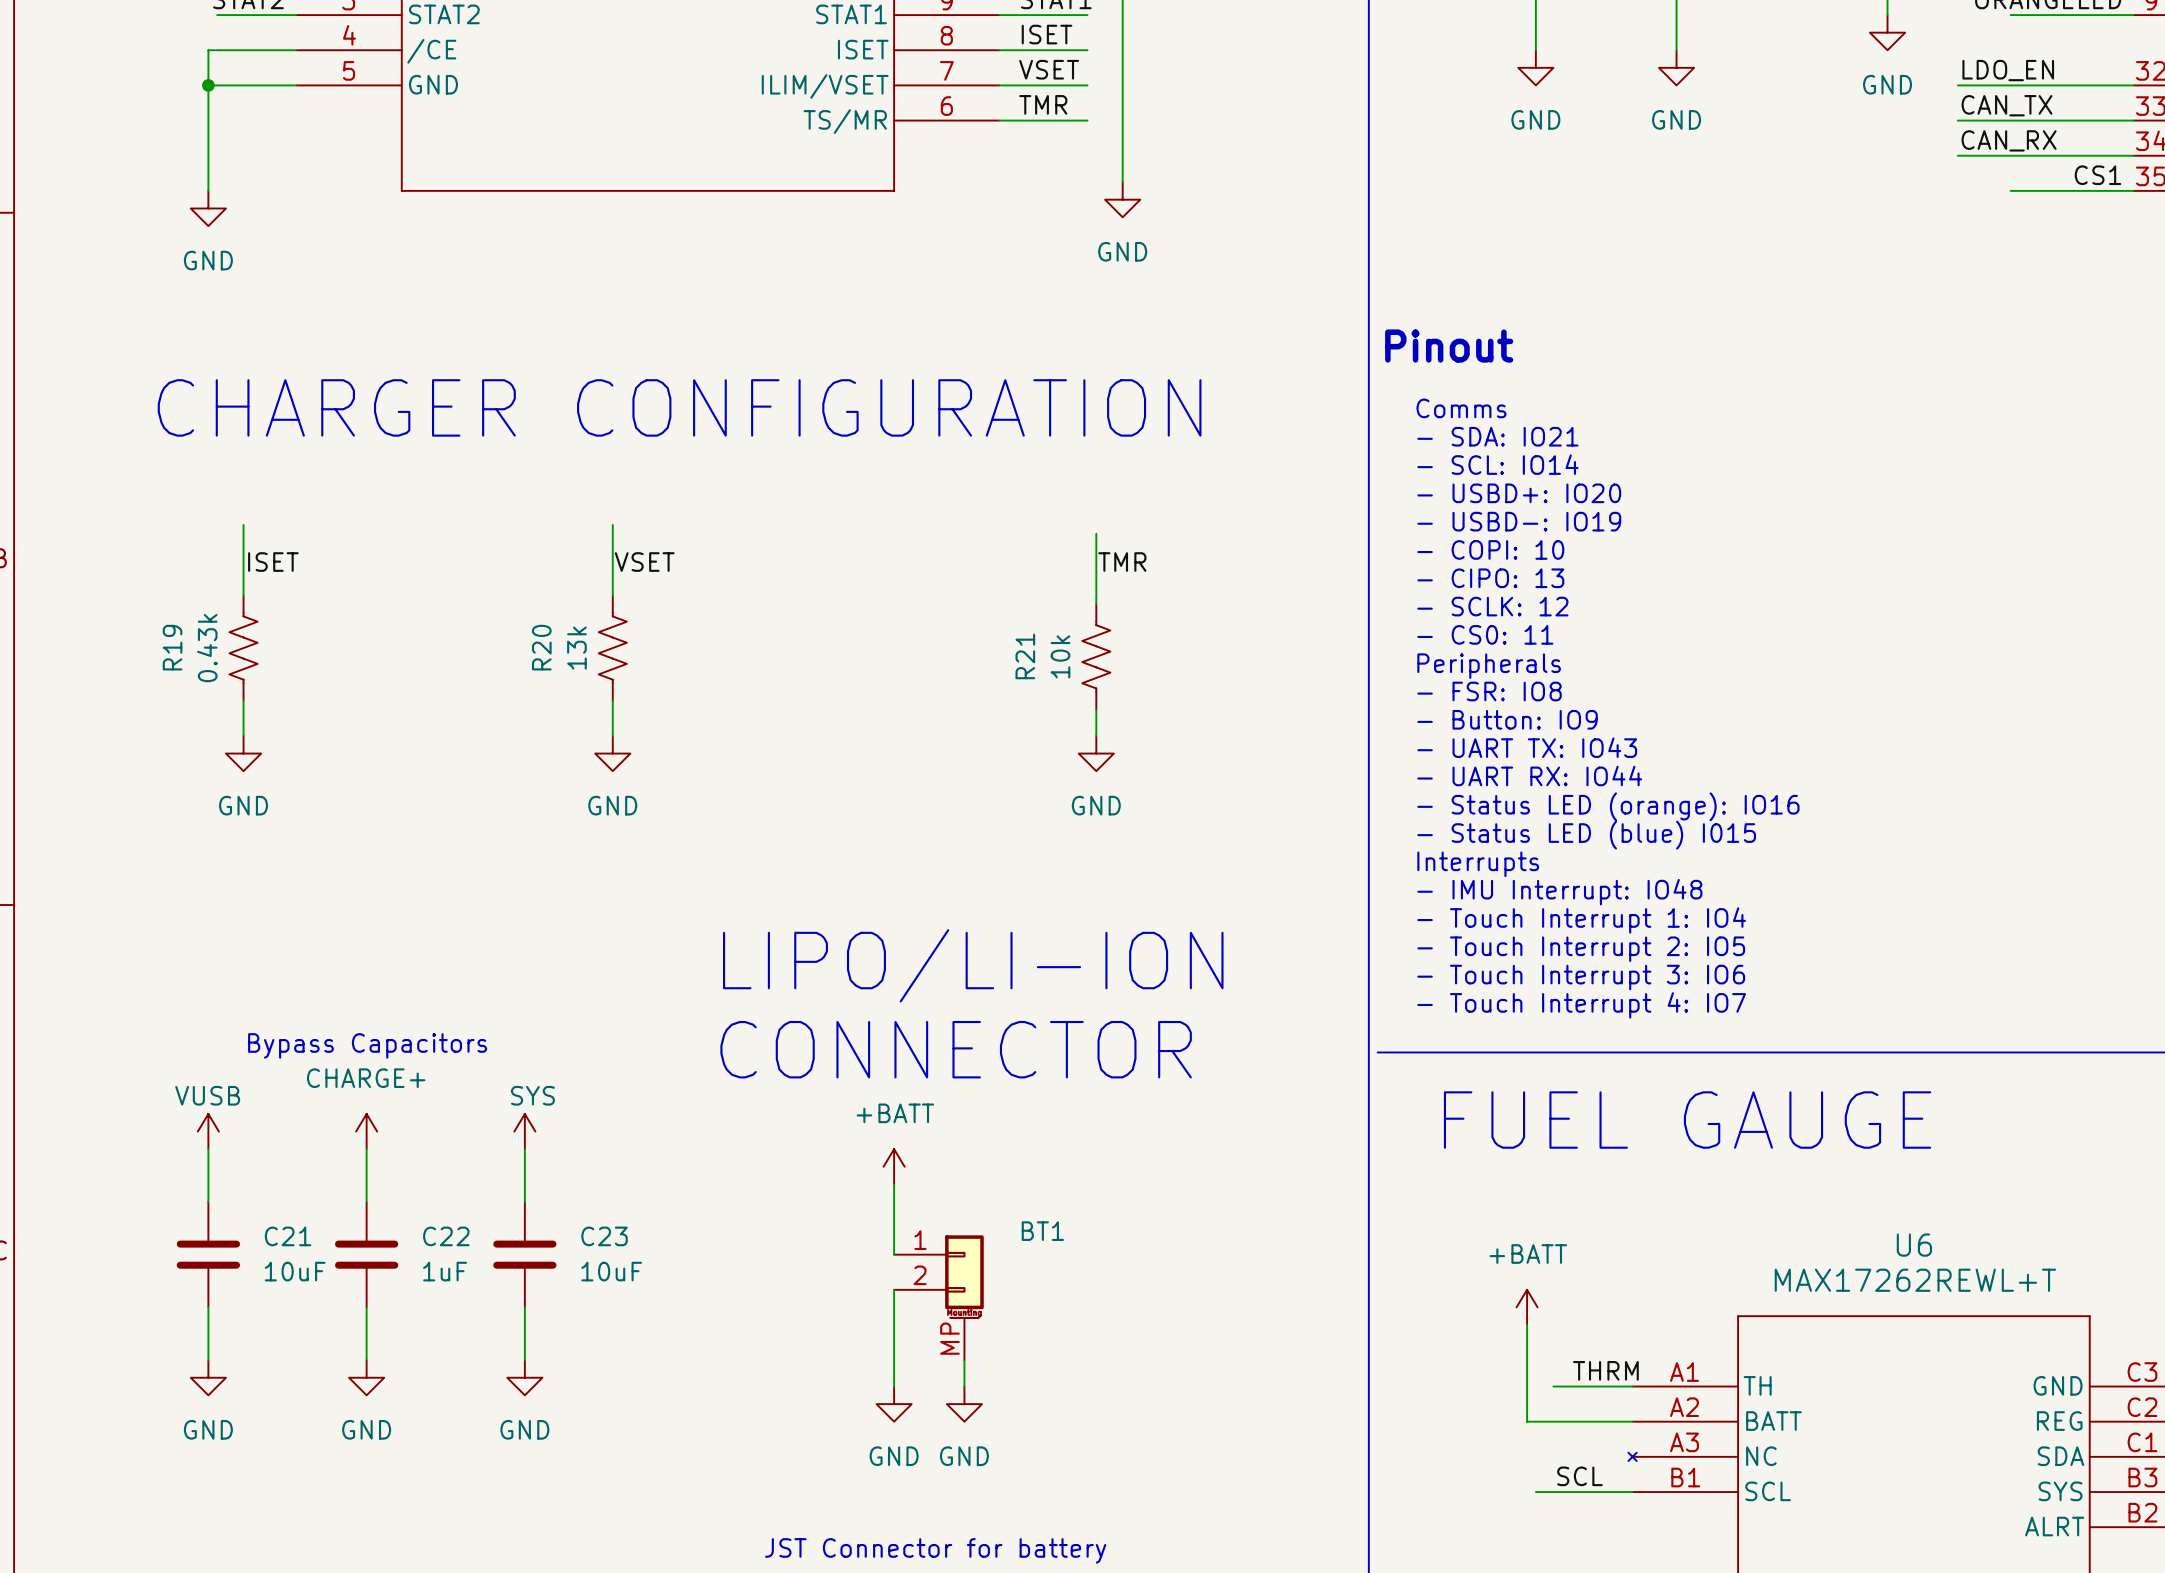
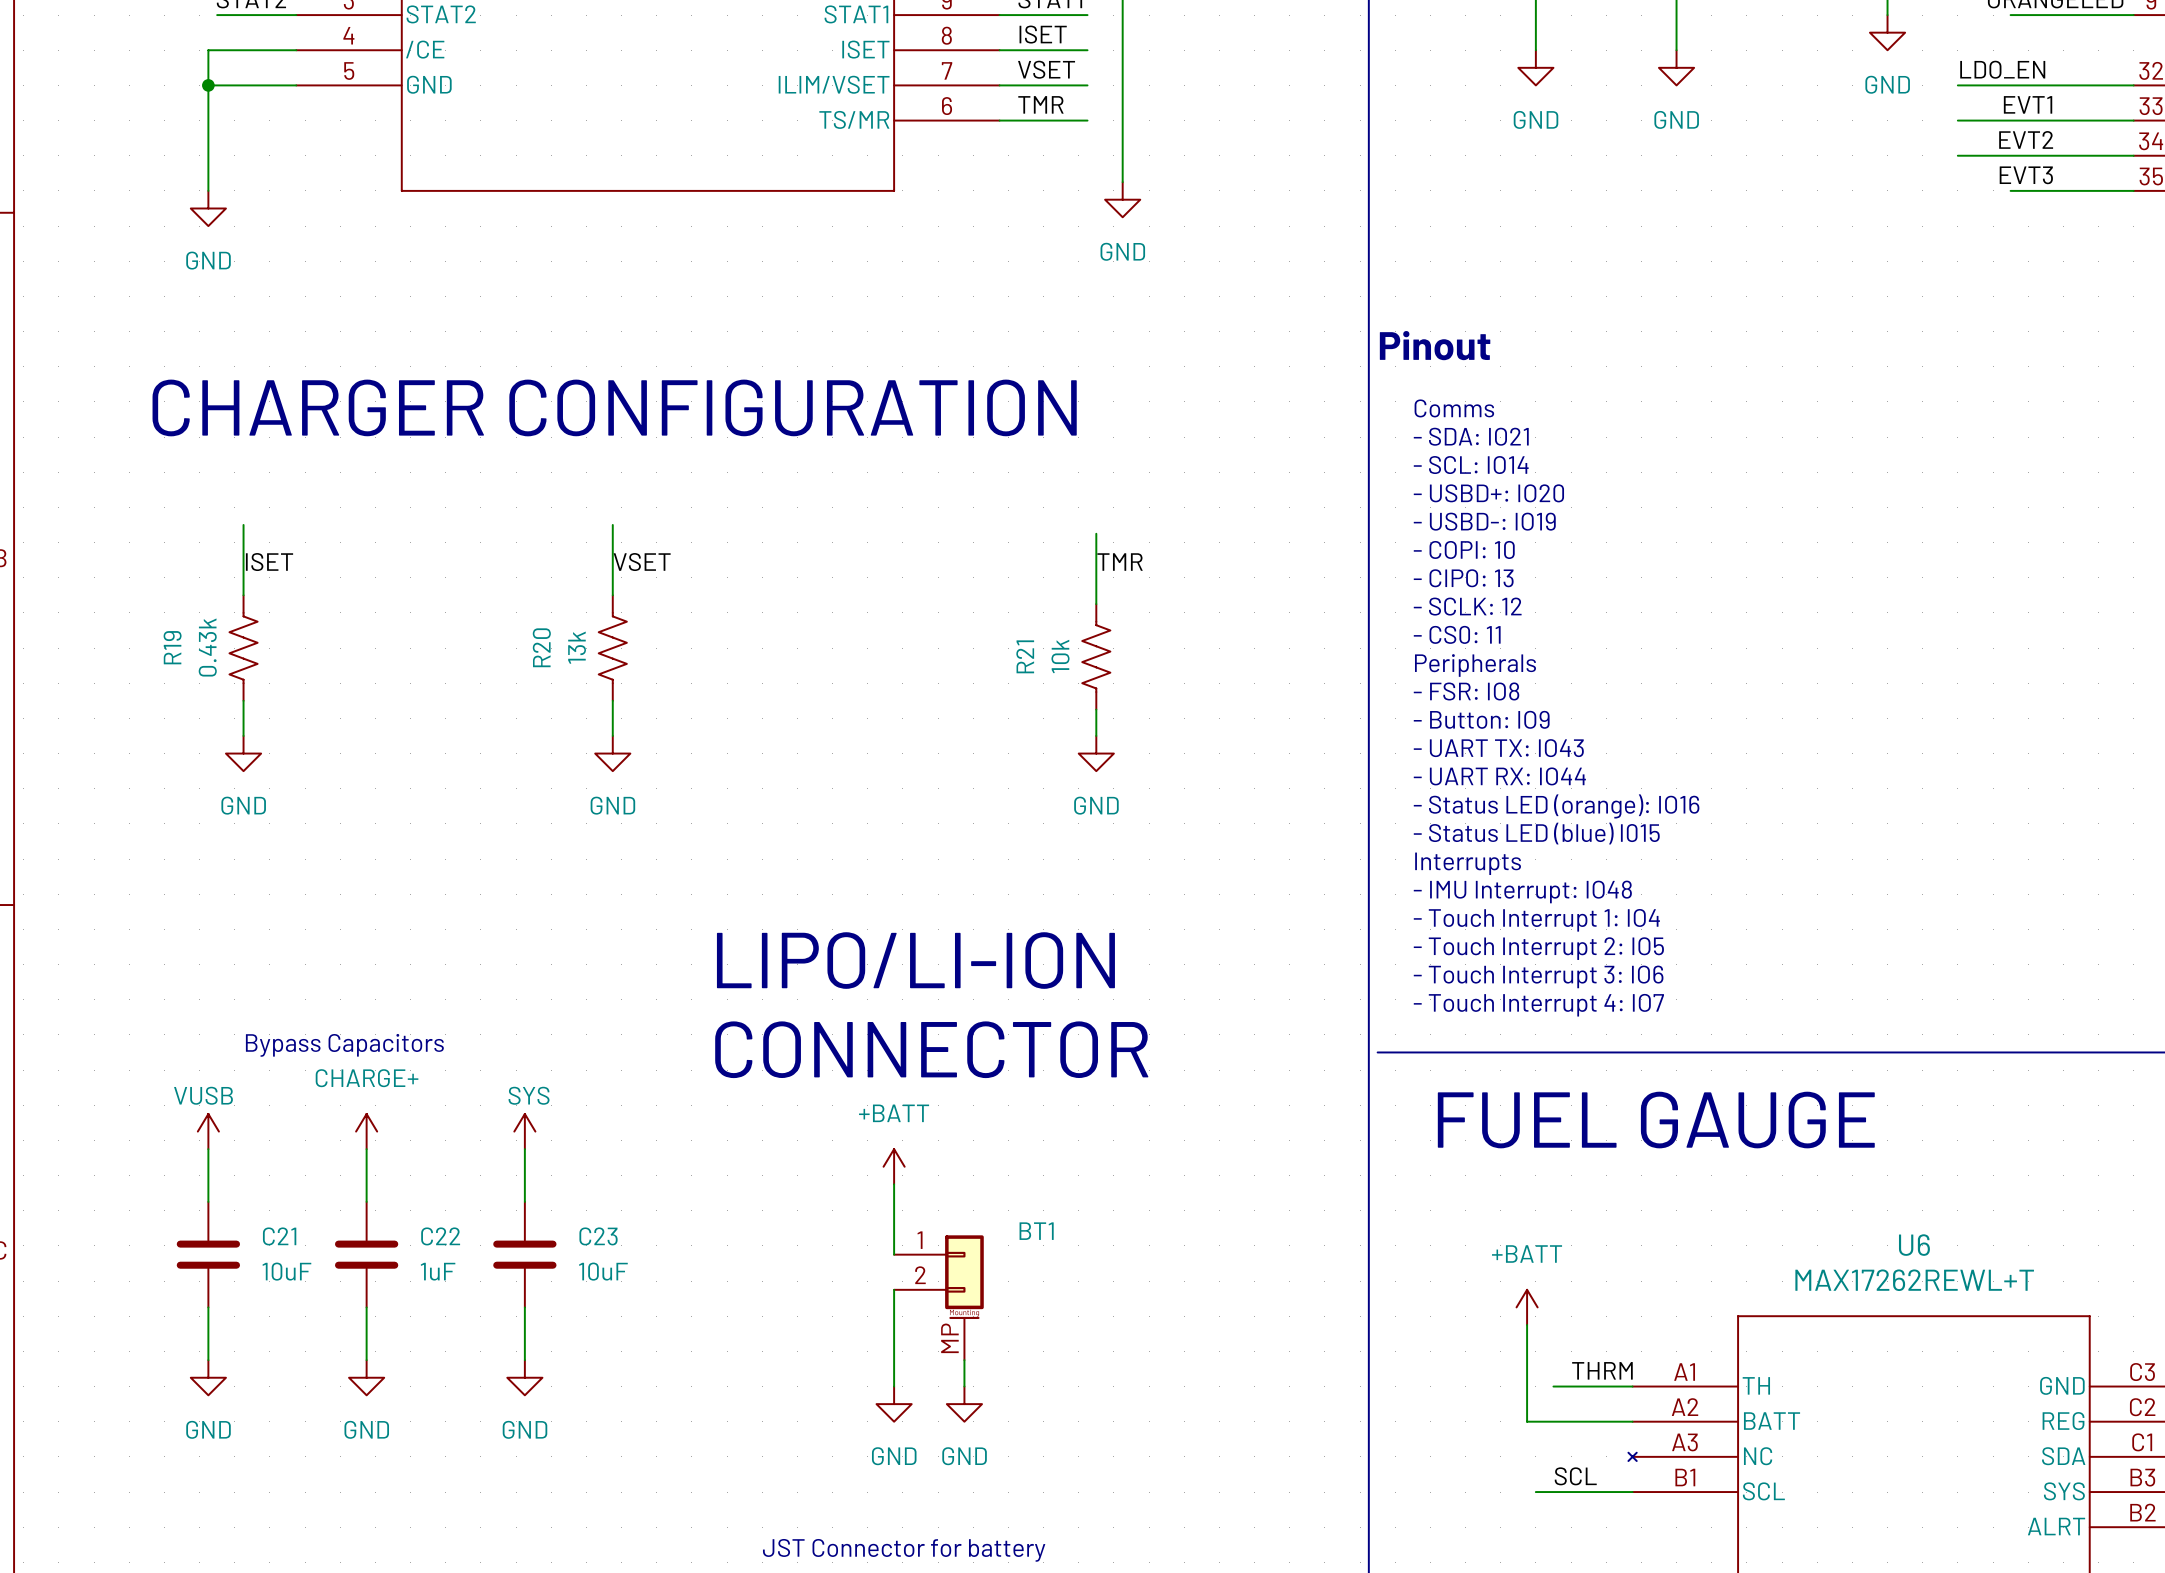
label: none -> EVT1 (2028, 104)
label: CAN_TX (2006, 105) -> none
label: CAN_RX (2009, 140) -> none
label: none -> EVT2 (2026, 139)
label: none -> EVT3 (2026, 175)
label: CS1 (2097, 175) -> none

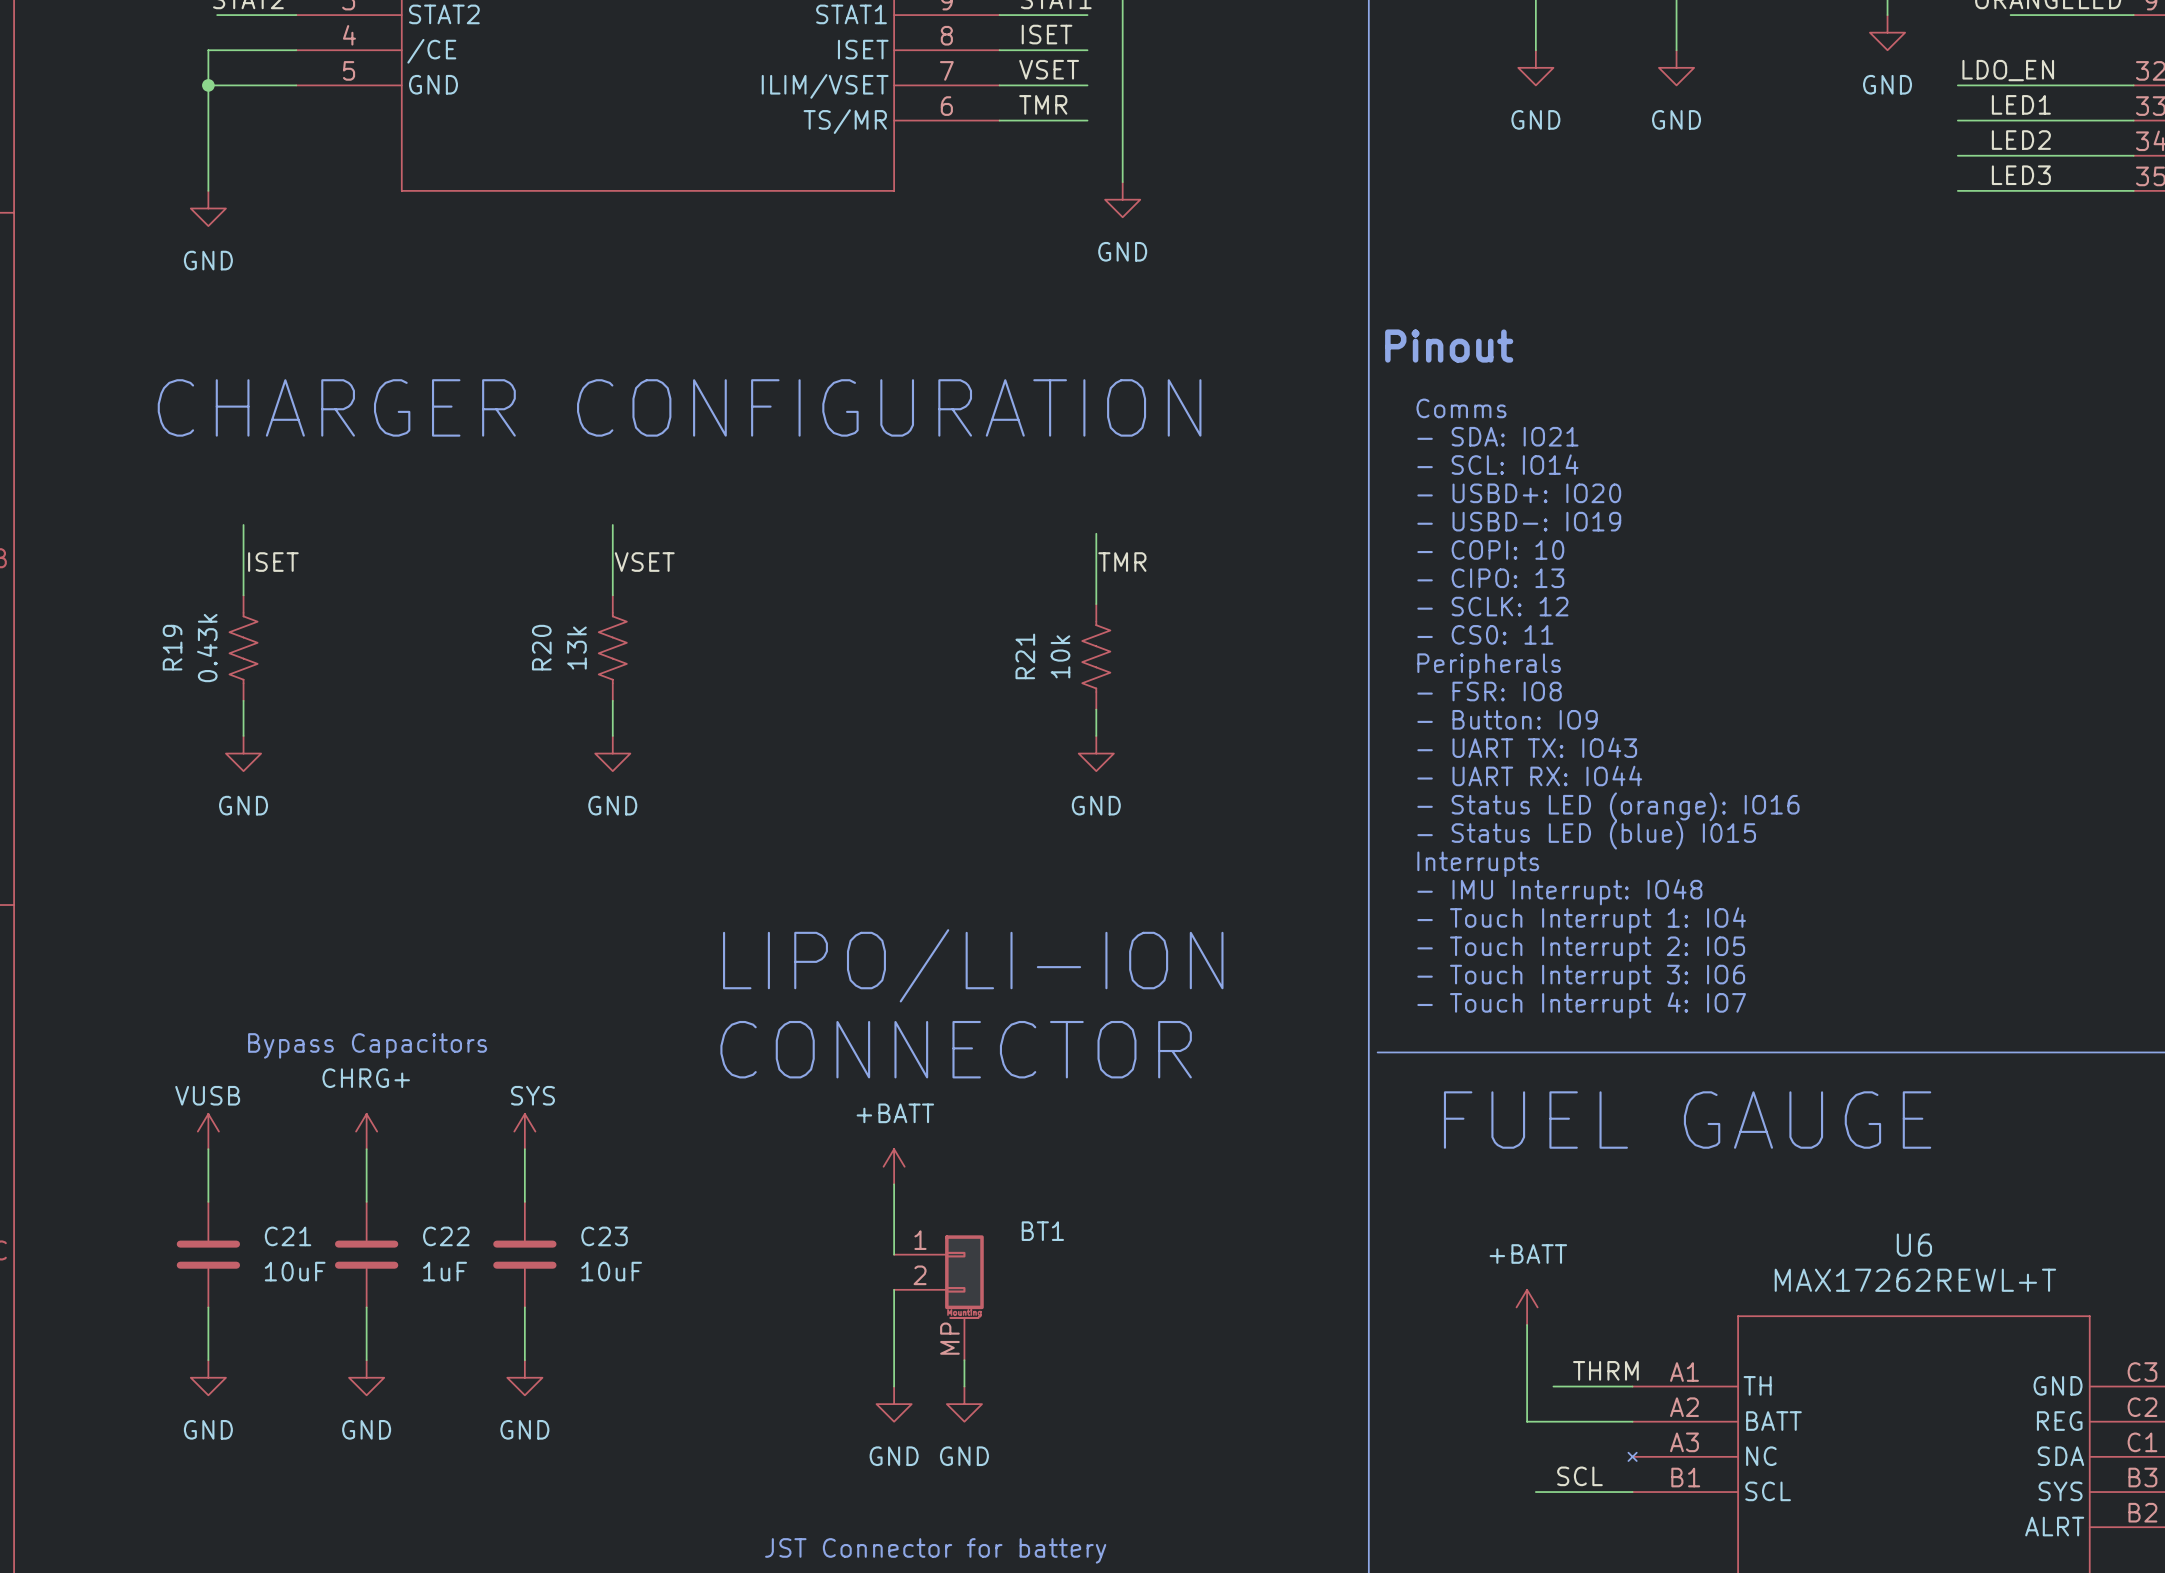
label: EVT1 (2028, 104) -> LED1 (2021, 104)
label: EVT2 (2026, 139) -> LED2 (2021, 140)
label: EVT3 (2026, 175) -> LED3 (2021, 175)
wire: none -> (1957, 190) (2010, 190)
power symbol: CHARGE+ (366, 1131) -> CHRG+ (366, 1131)

